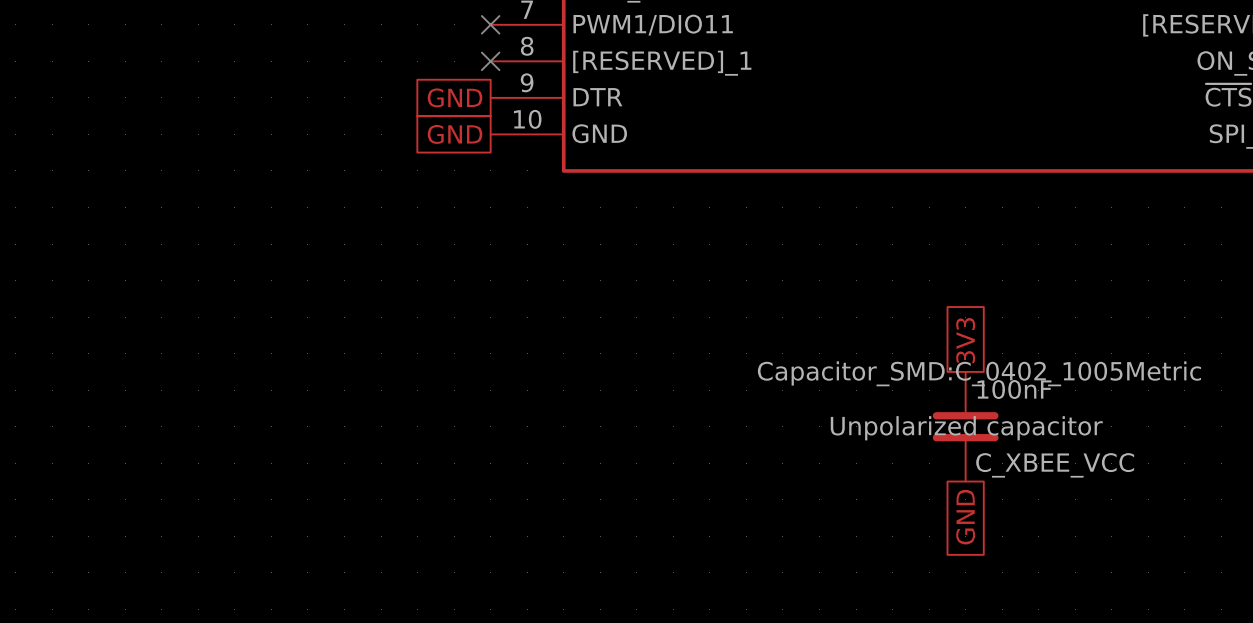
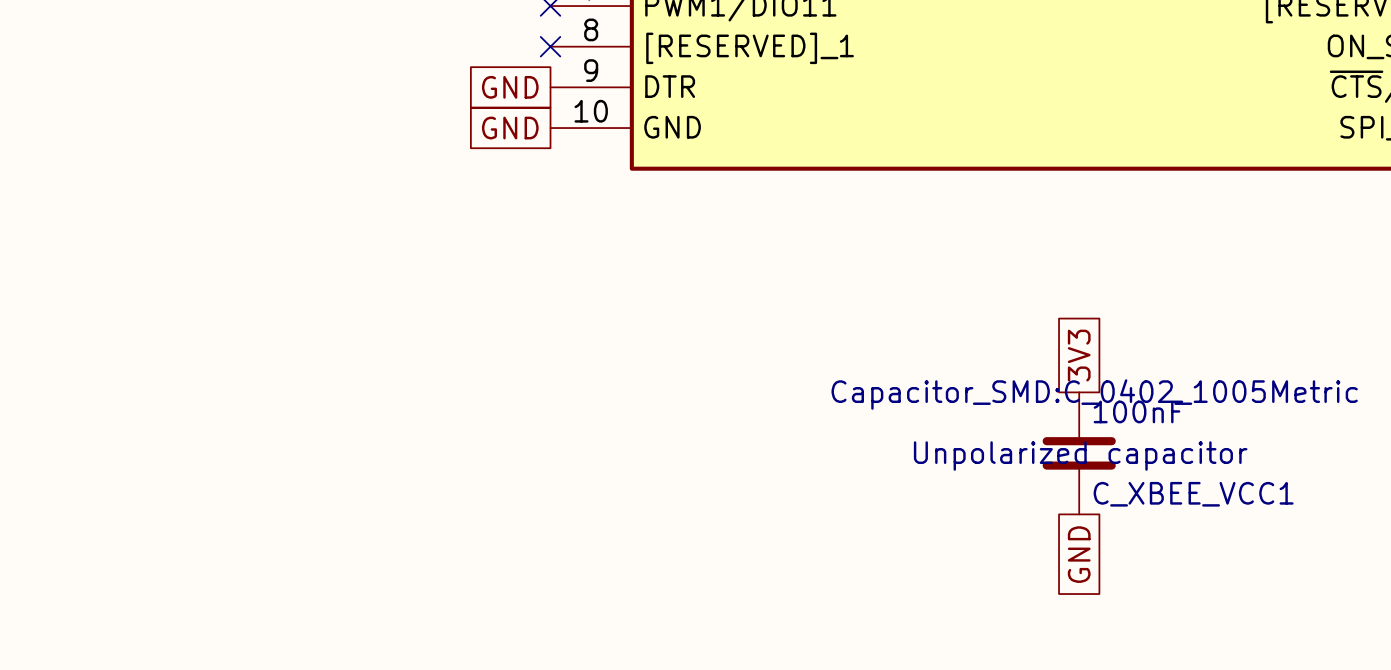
C_XBEE_VCC name: C_XBEE_VCC (1055, 465) -> C_XBEE_VCC1 (1193, 494)

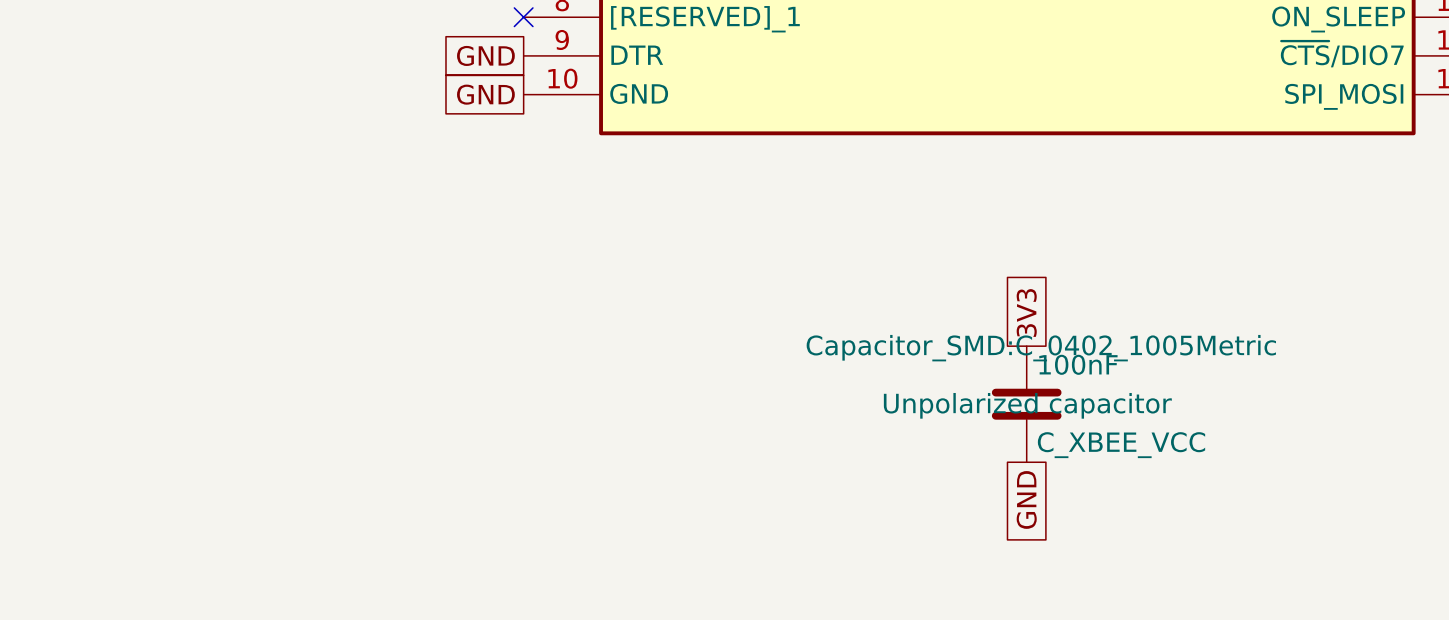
C_XBEE_VCC1 name: C_XBEE_VCC1 (1193, 494) -> C_XBEE_VCC (1121, 445)

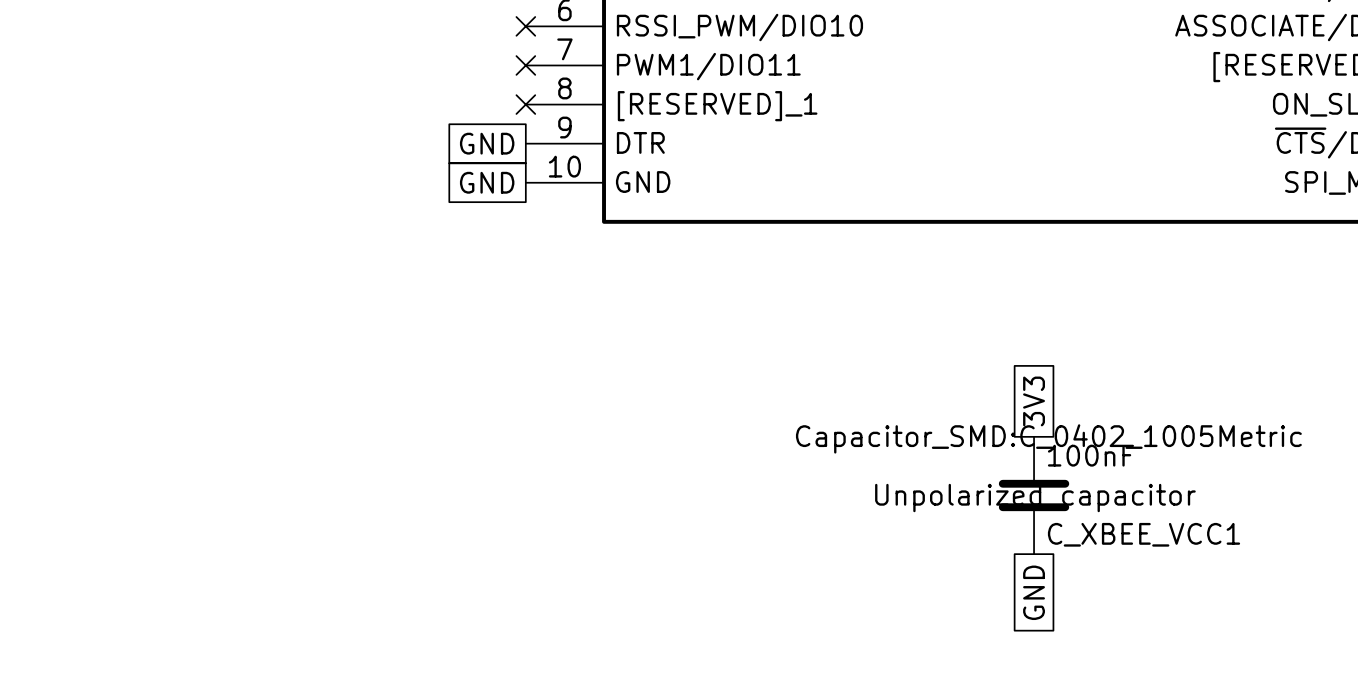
C_XBEE_VCC name: C_XBEE_VCC (1121, 445) -> C_XBEE_VCC1 (1144, 534)

